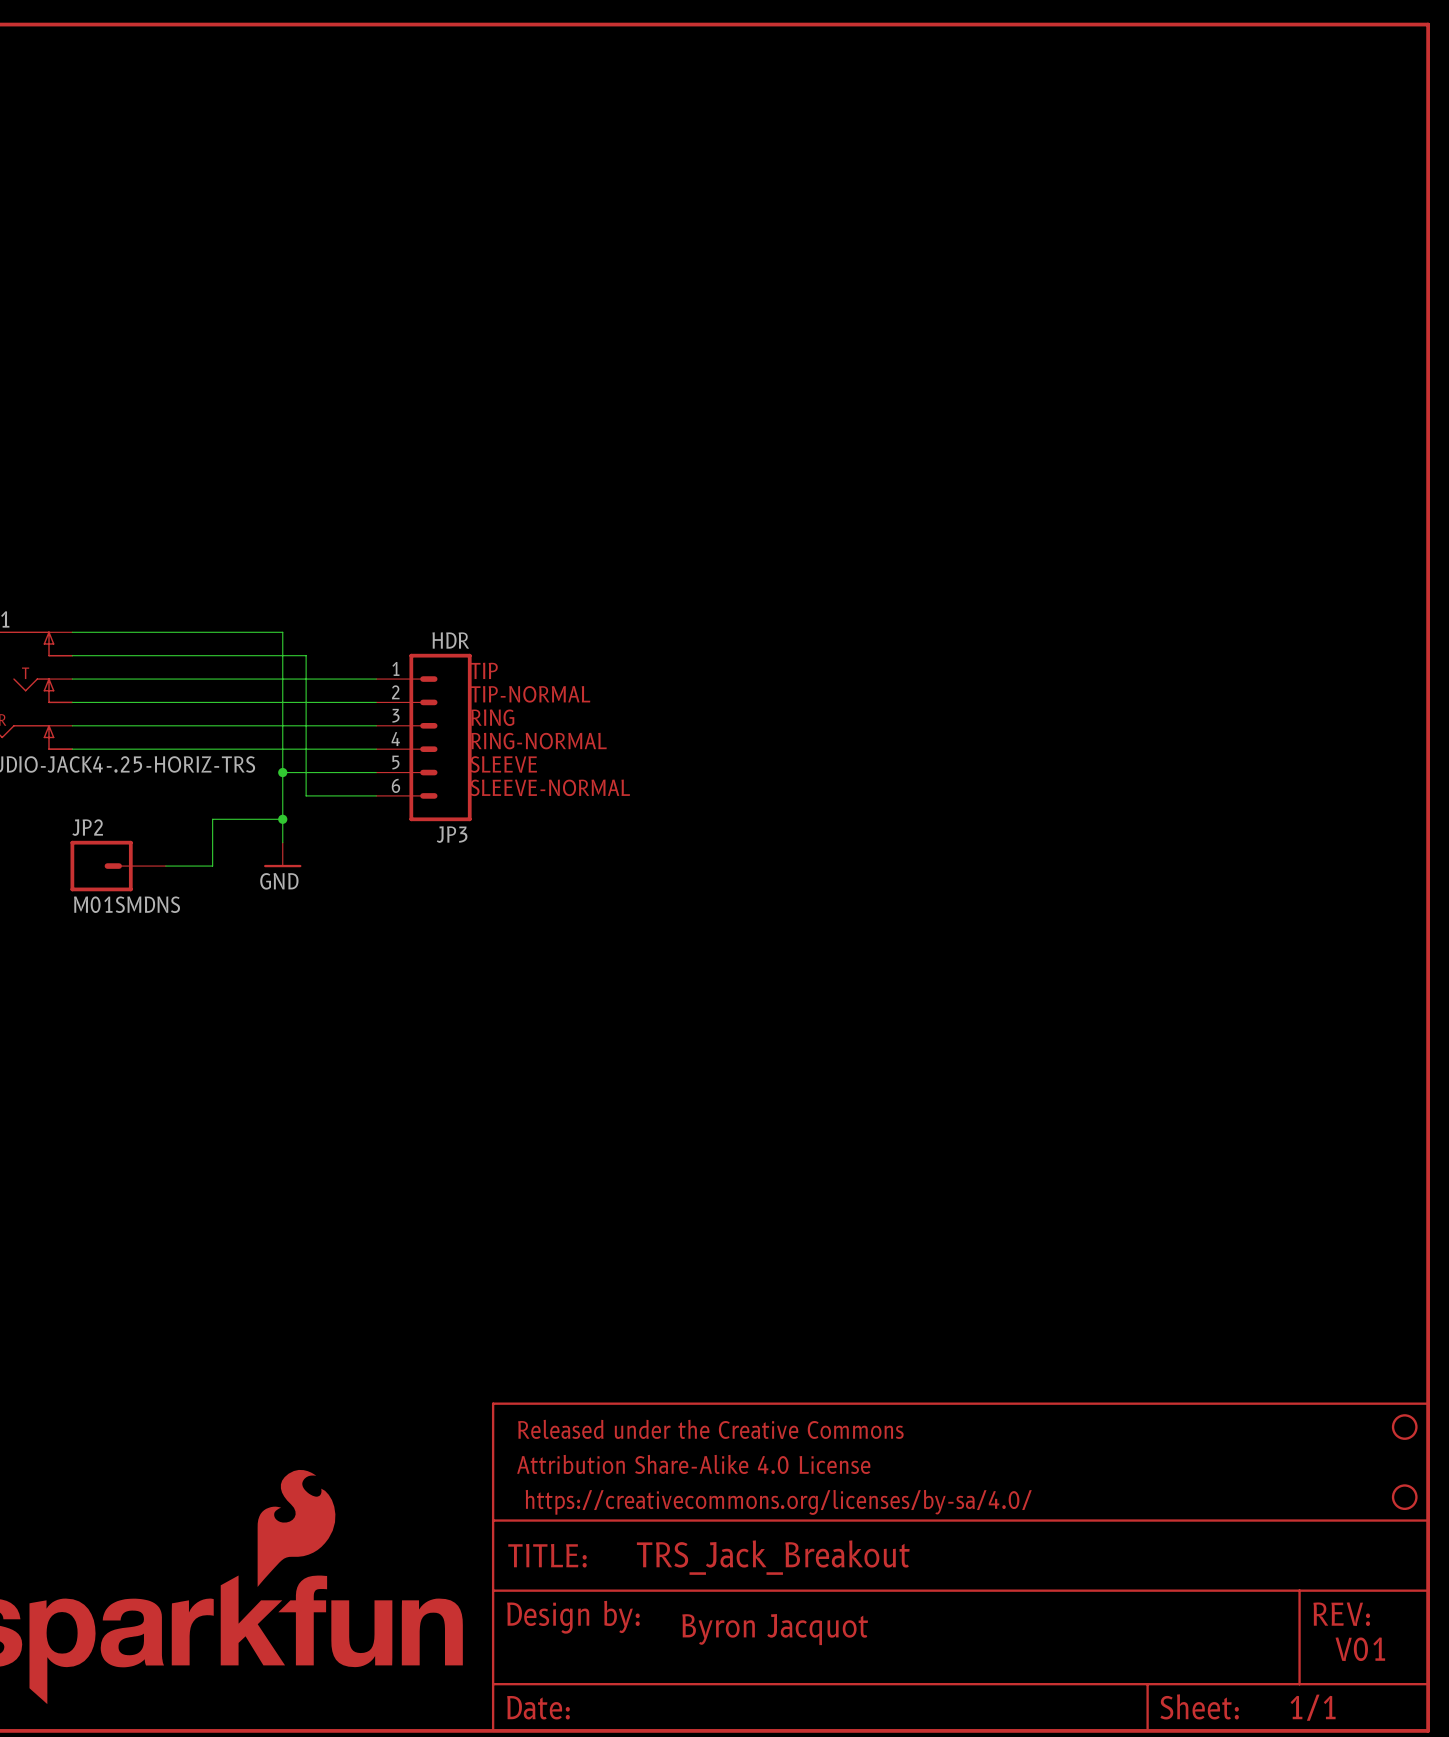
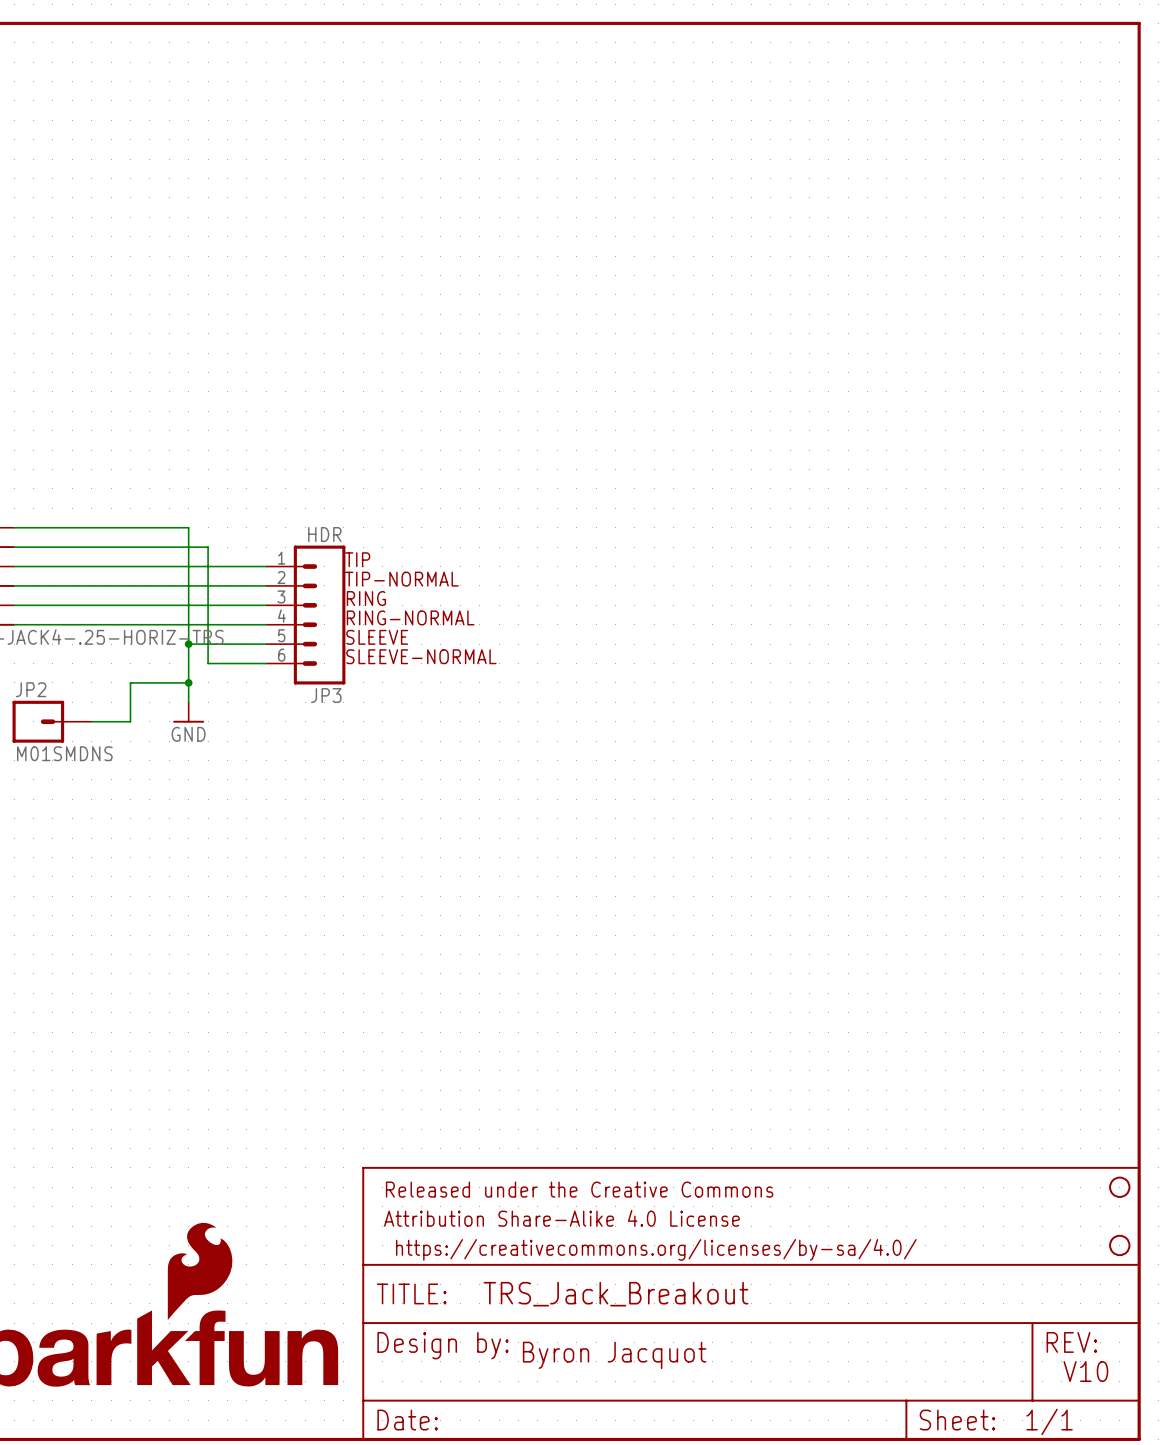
text: V01 (1360, 1649) -> V10 (1085, 1371)

